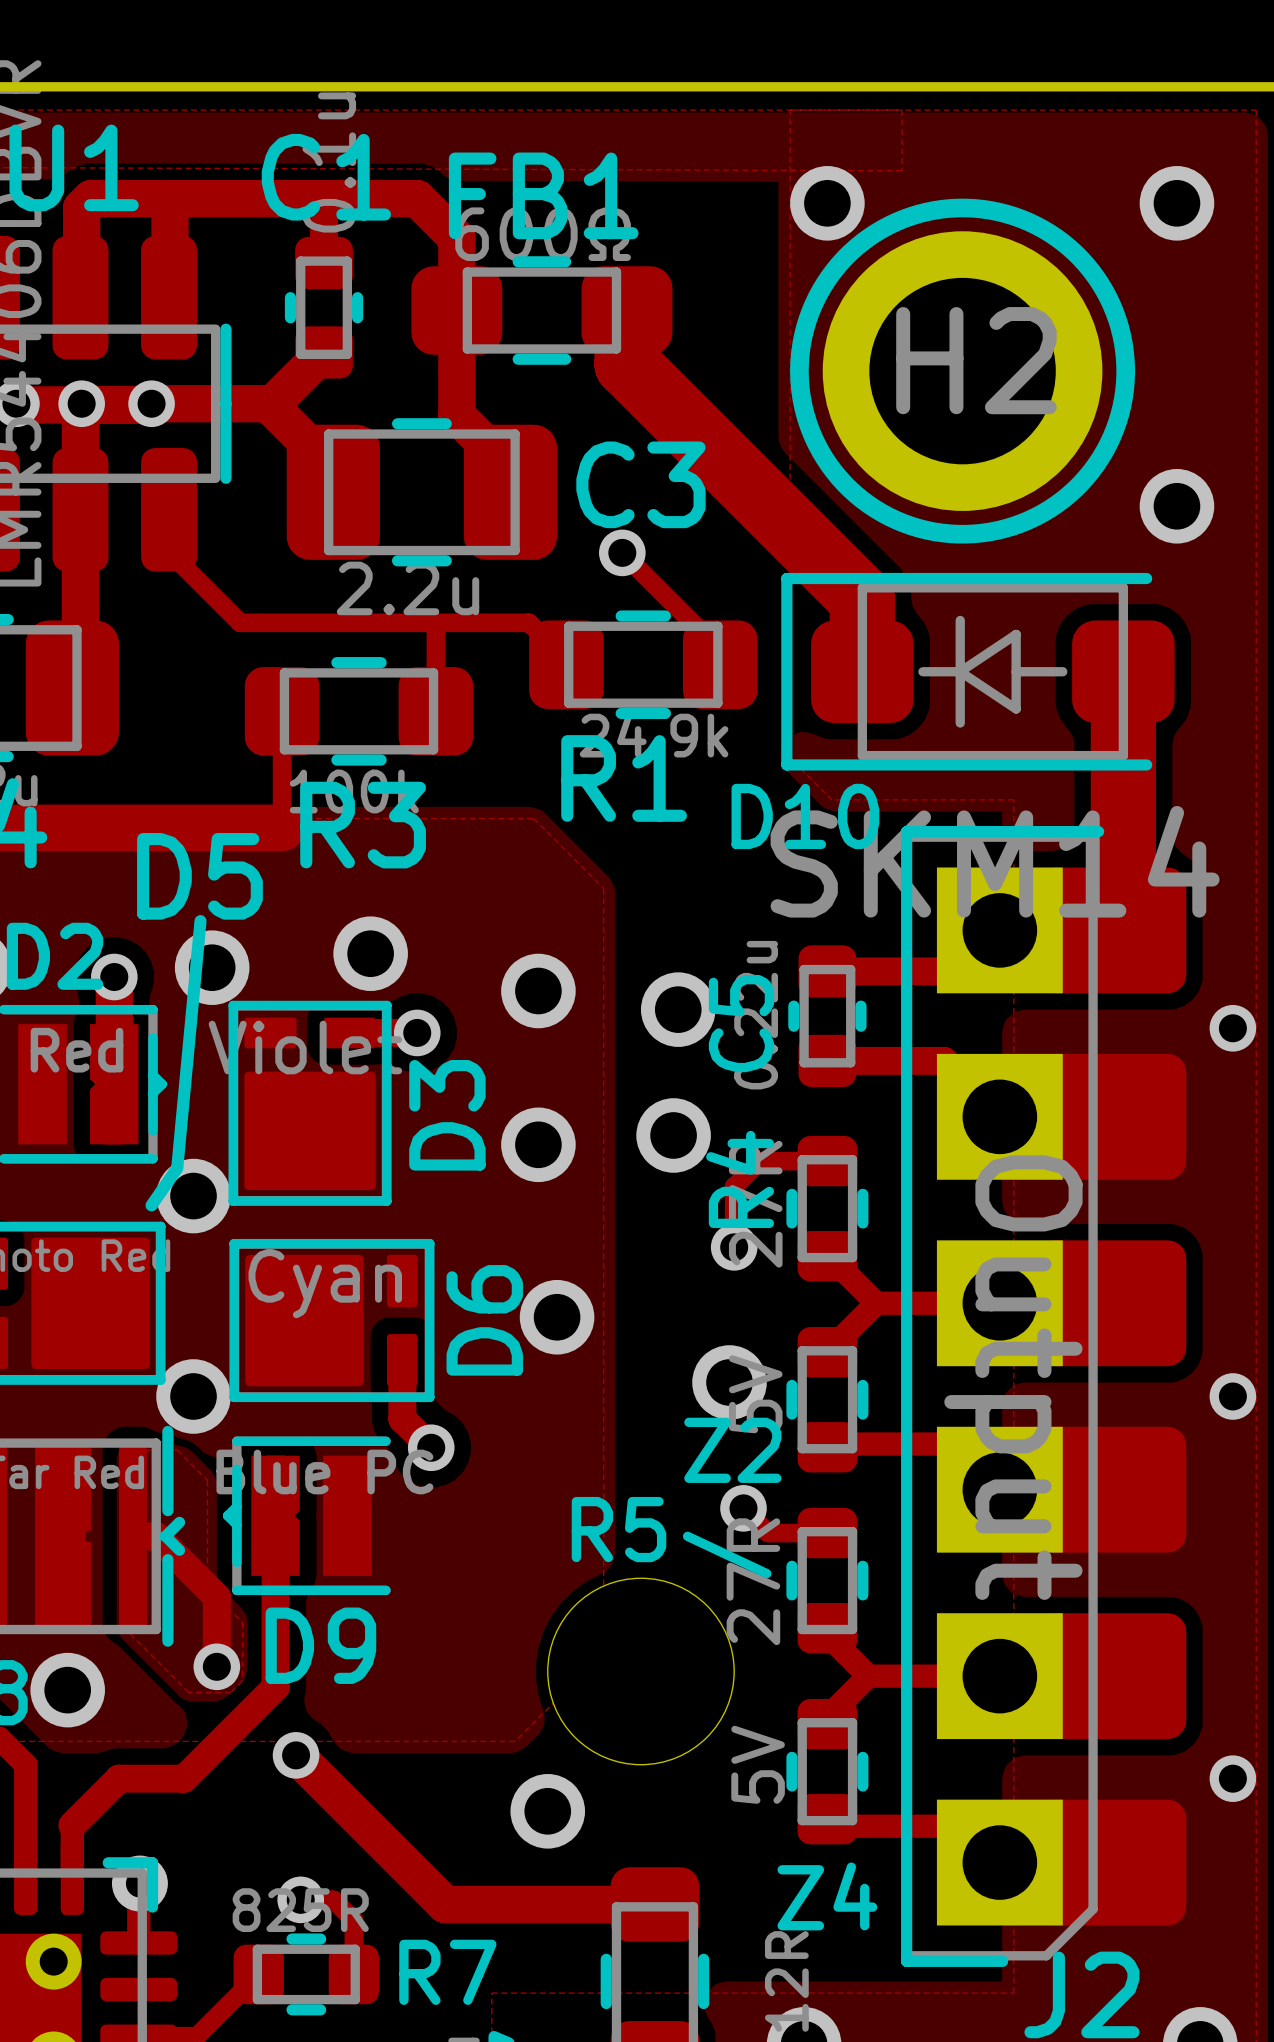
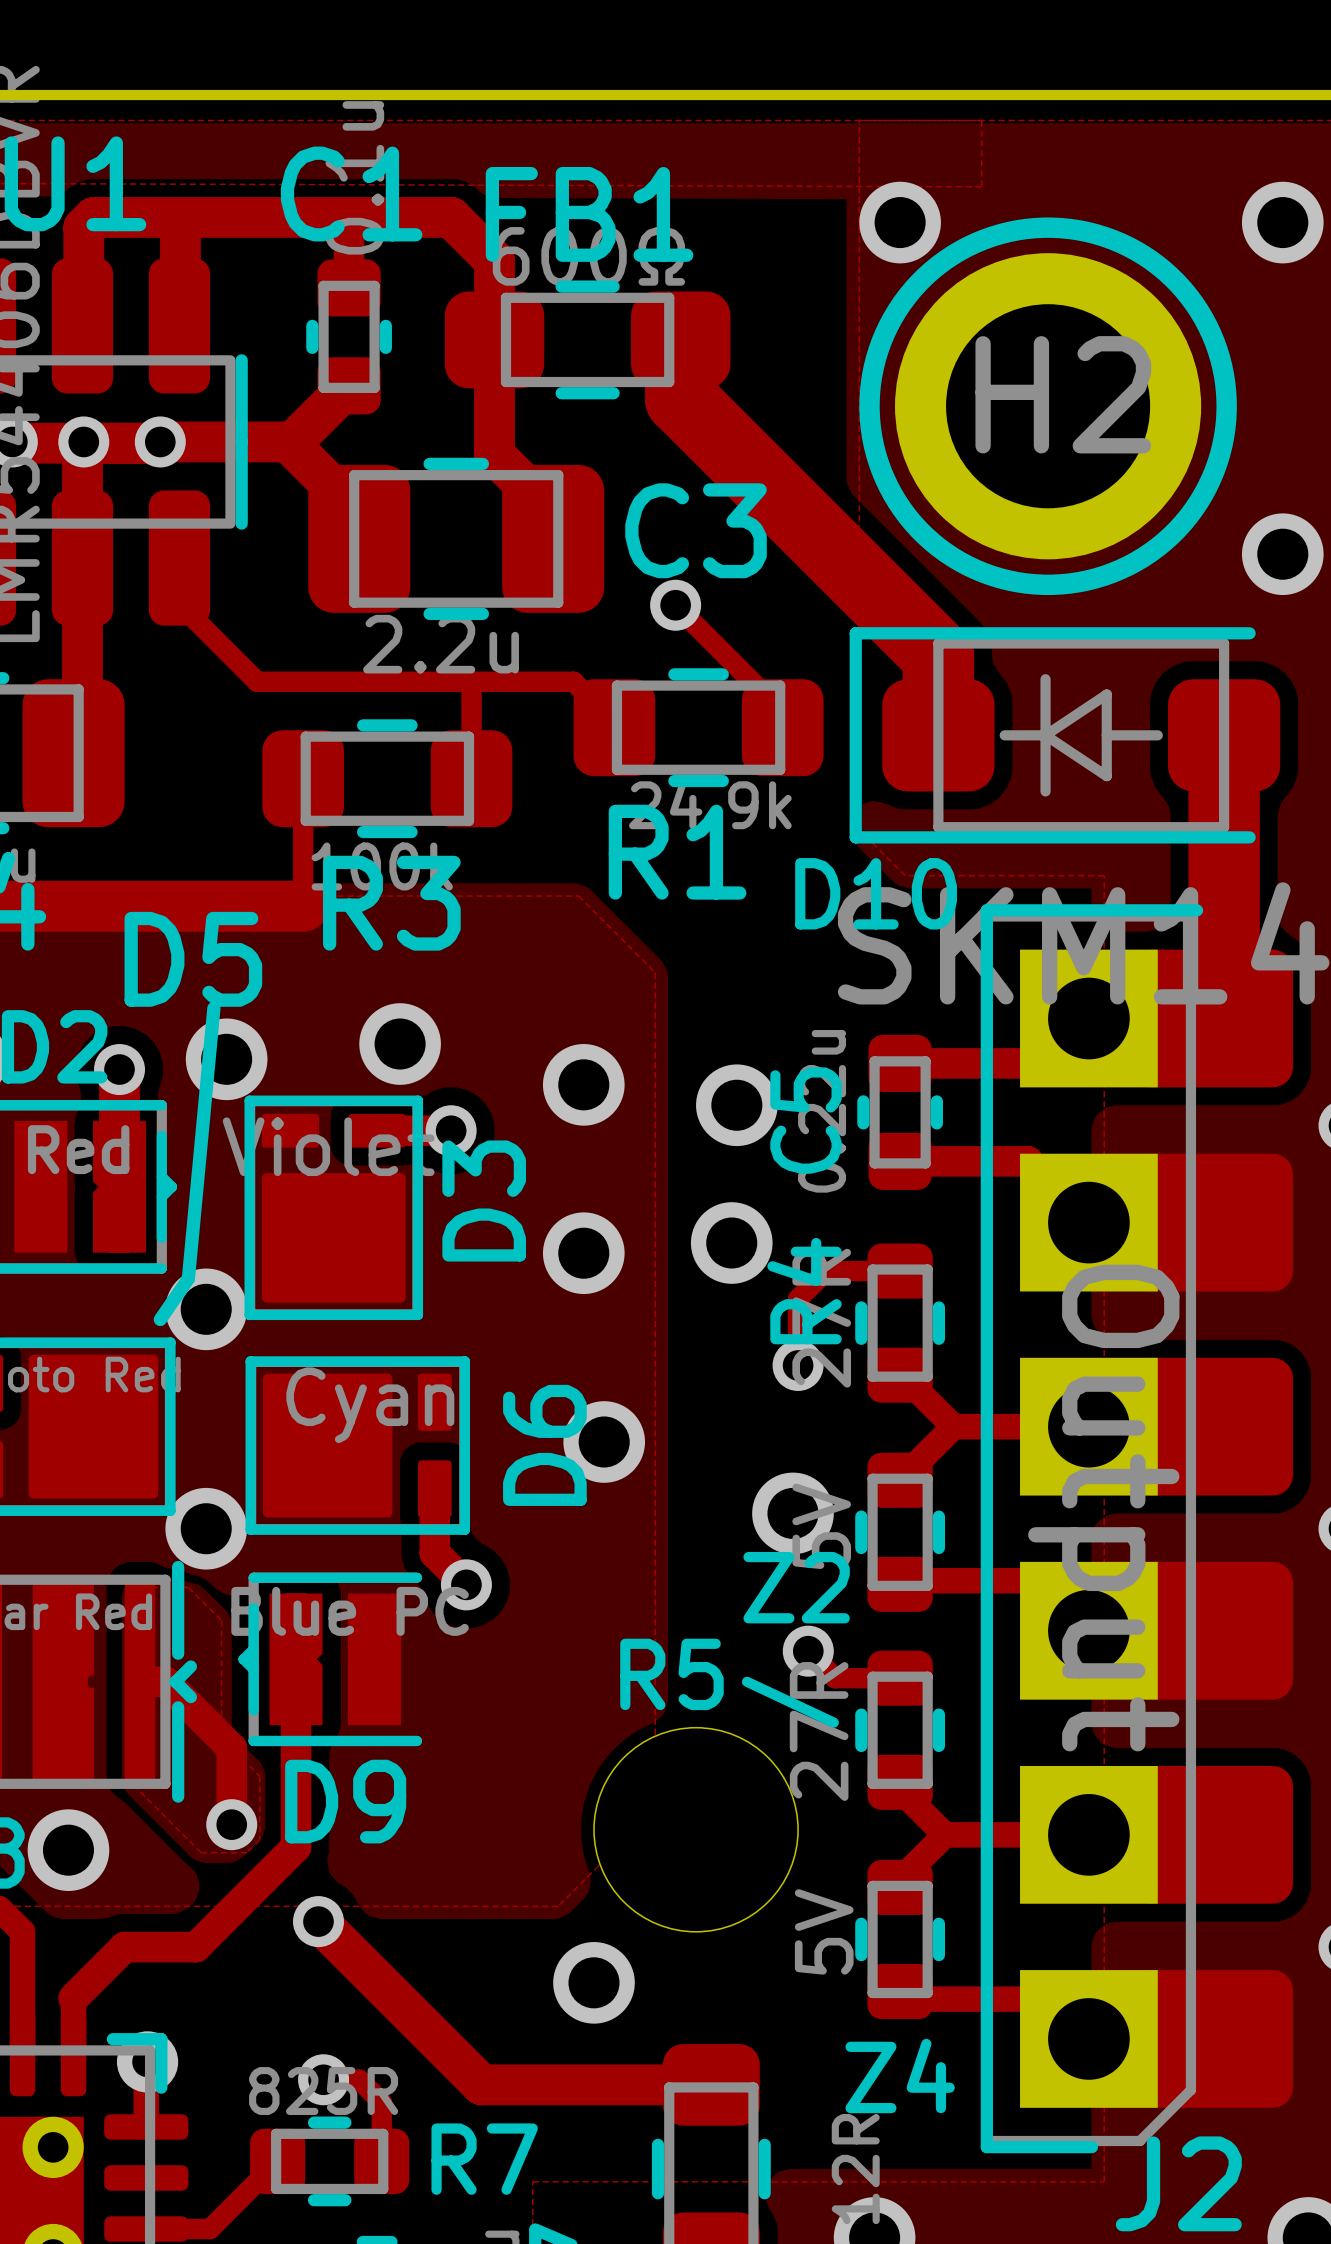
D5 name position: D5 (199, 876) -> D5 (193, 959)
D3 name position: D3 (447, 1115) -> D3 (484, 1201)
D6 value position: Cyan (325, 1283) -> Cyan (370, 1405)
D6 name position: D6 (484, 1320) -> D6 (544, 1445)

